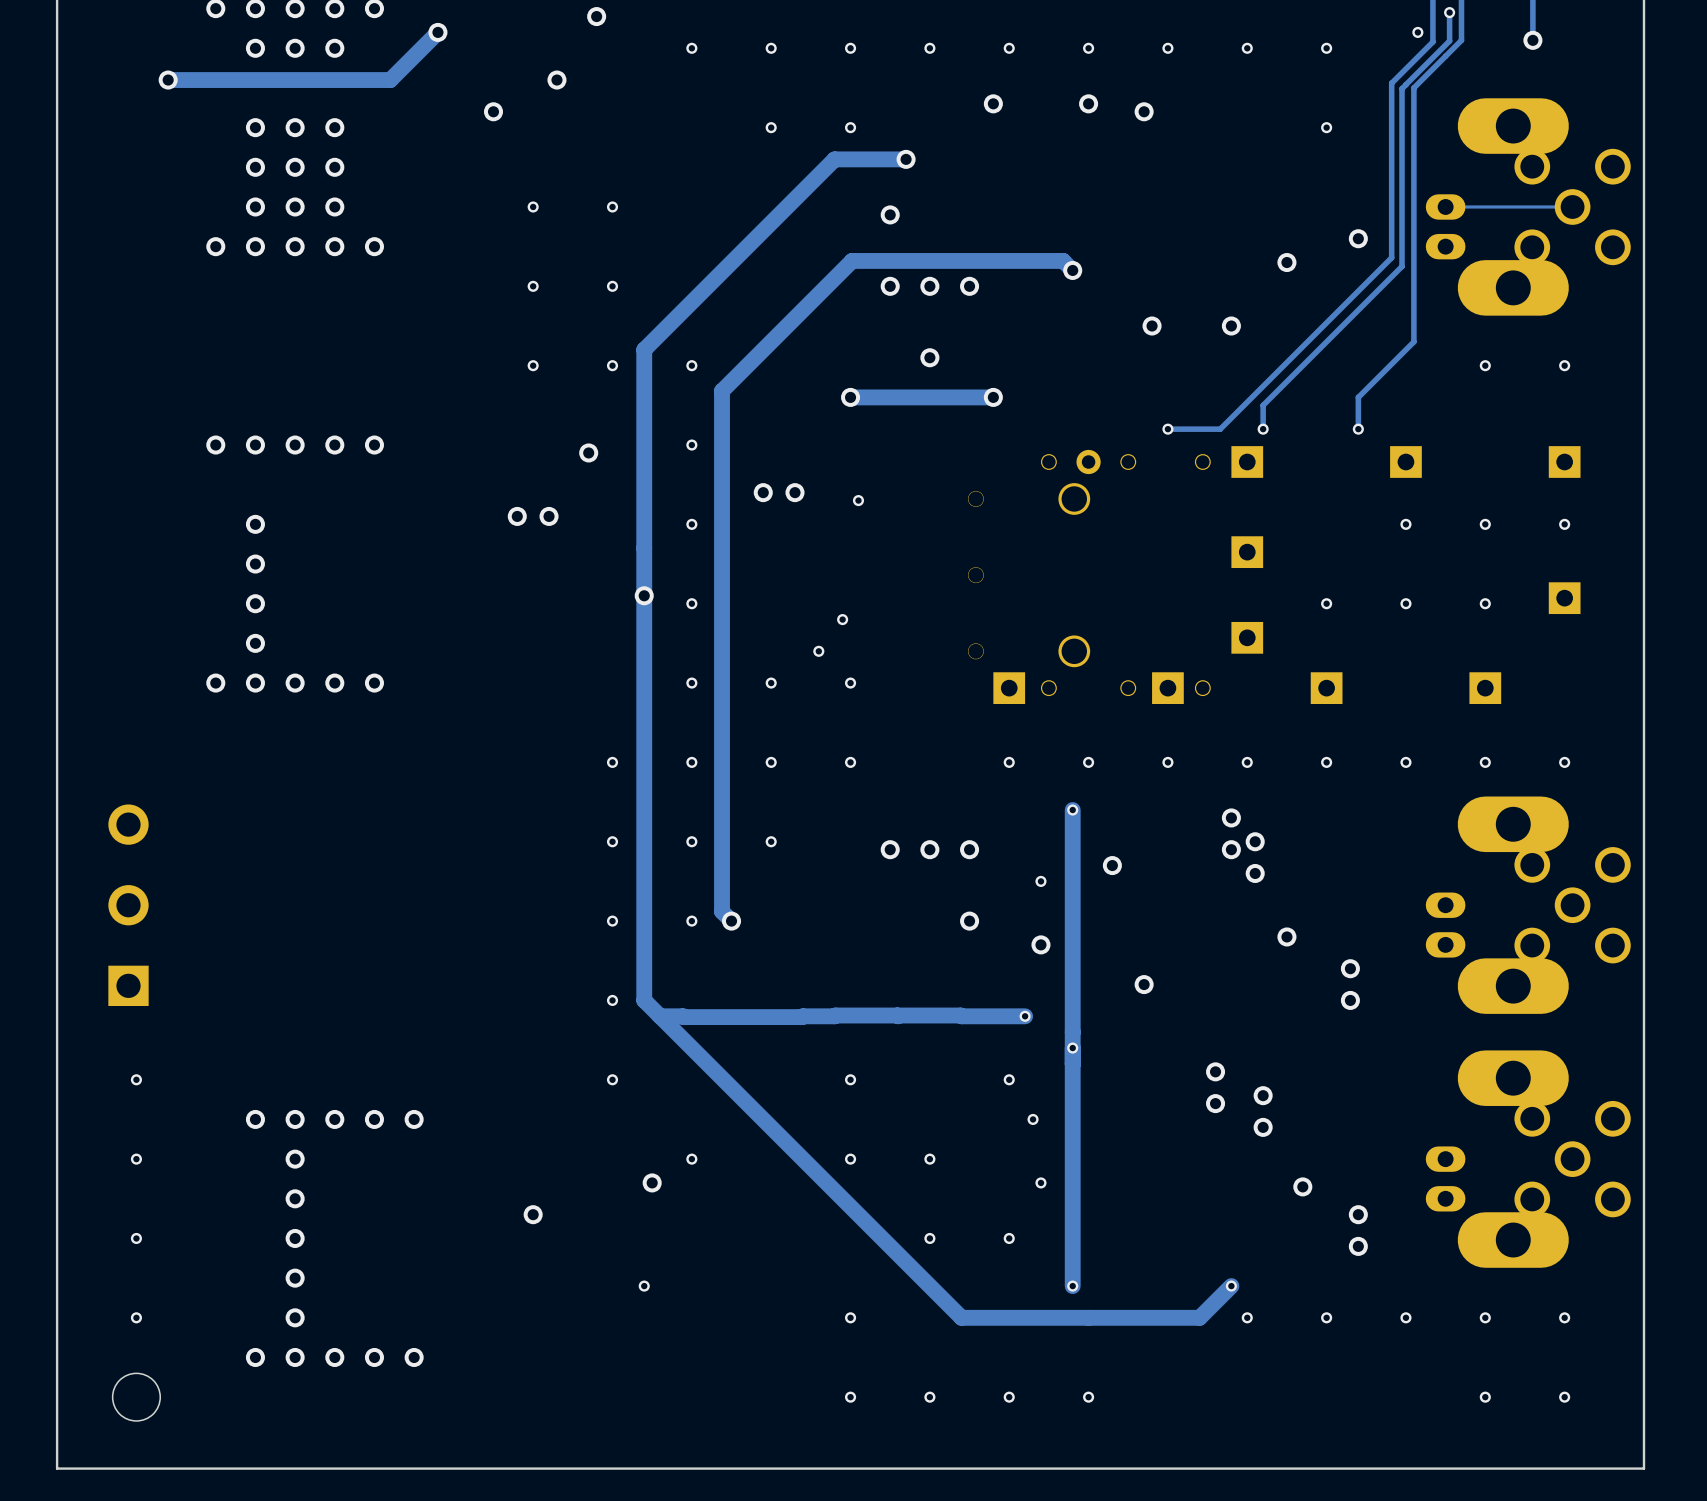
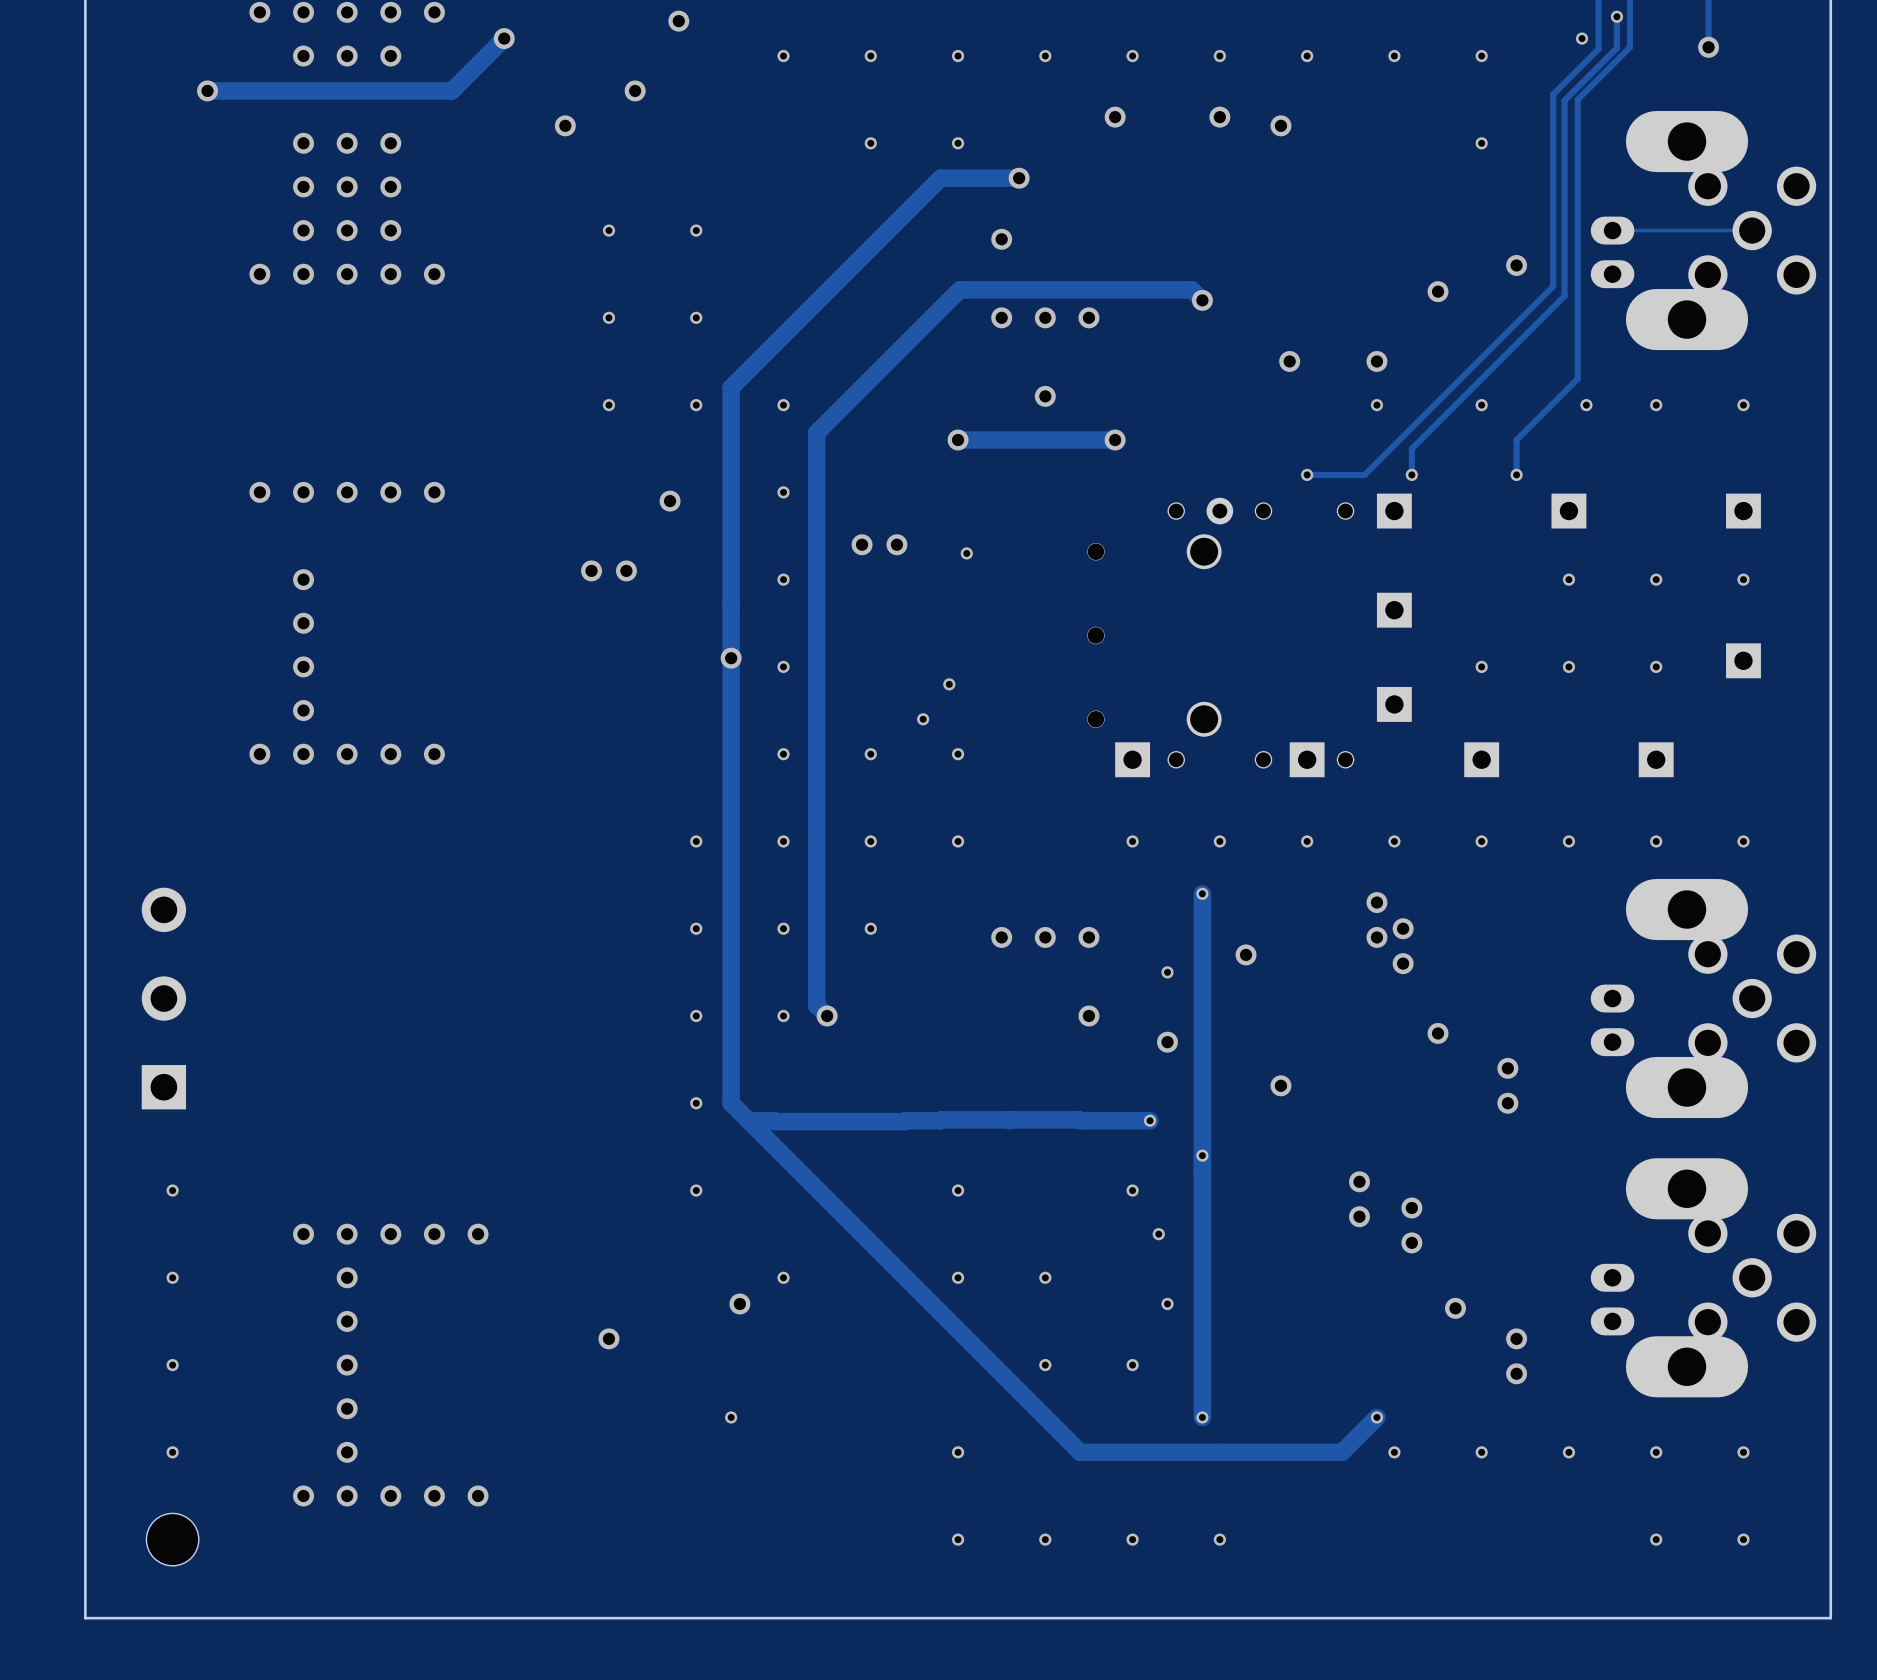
via: none -> (1376, 405)
via: none -> (1481, 405)
via: none -> (1586, 405)

